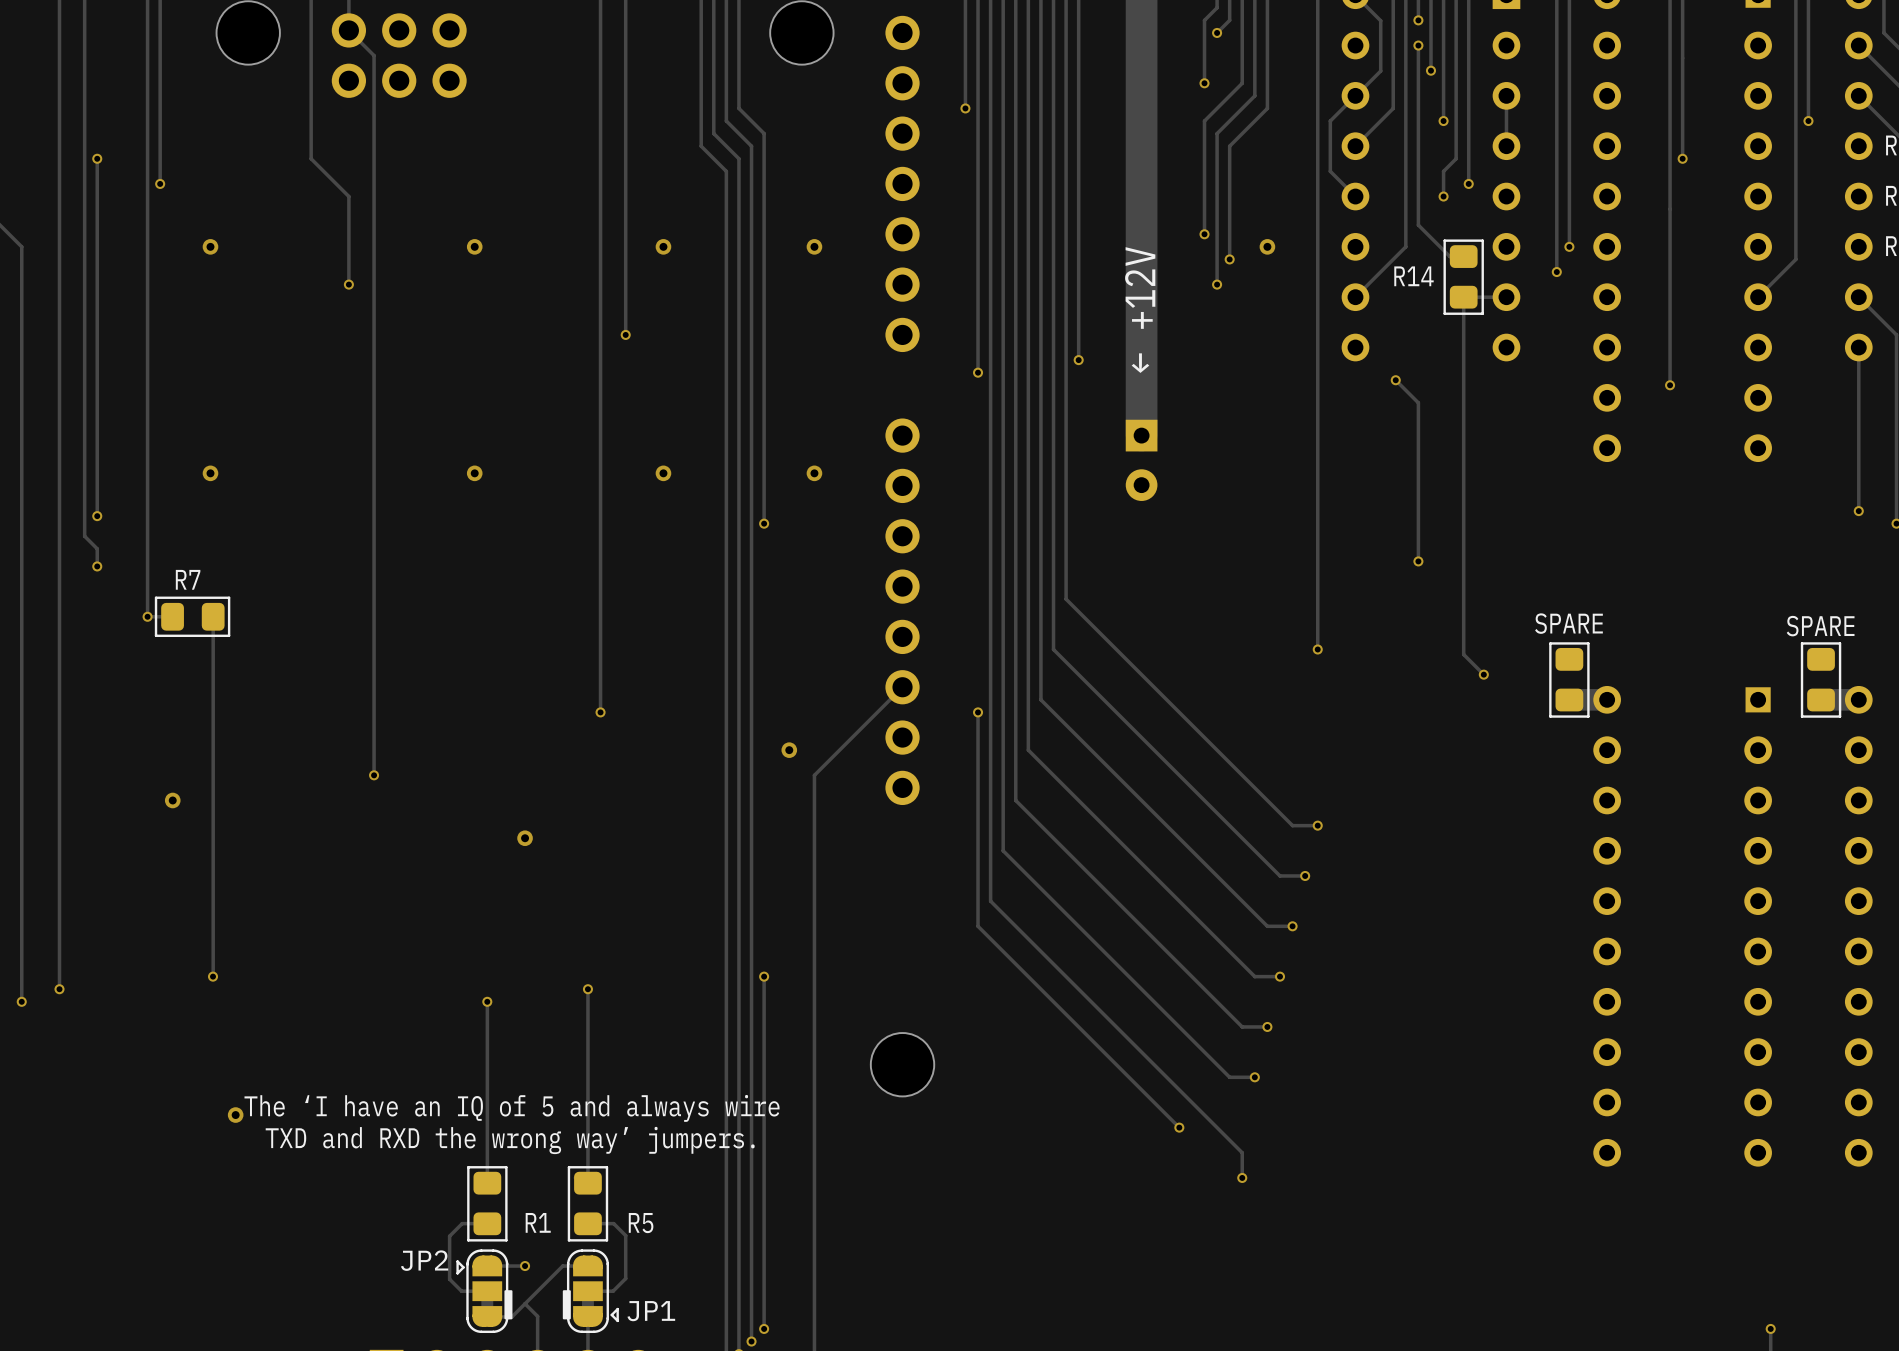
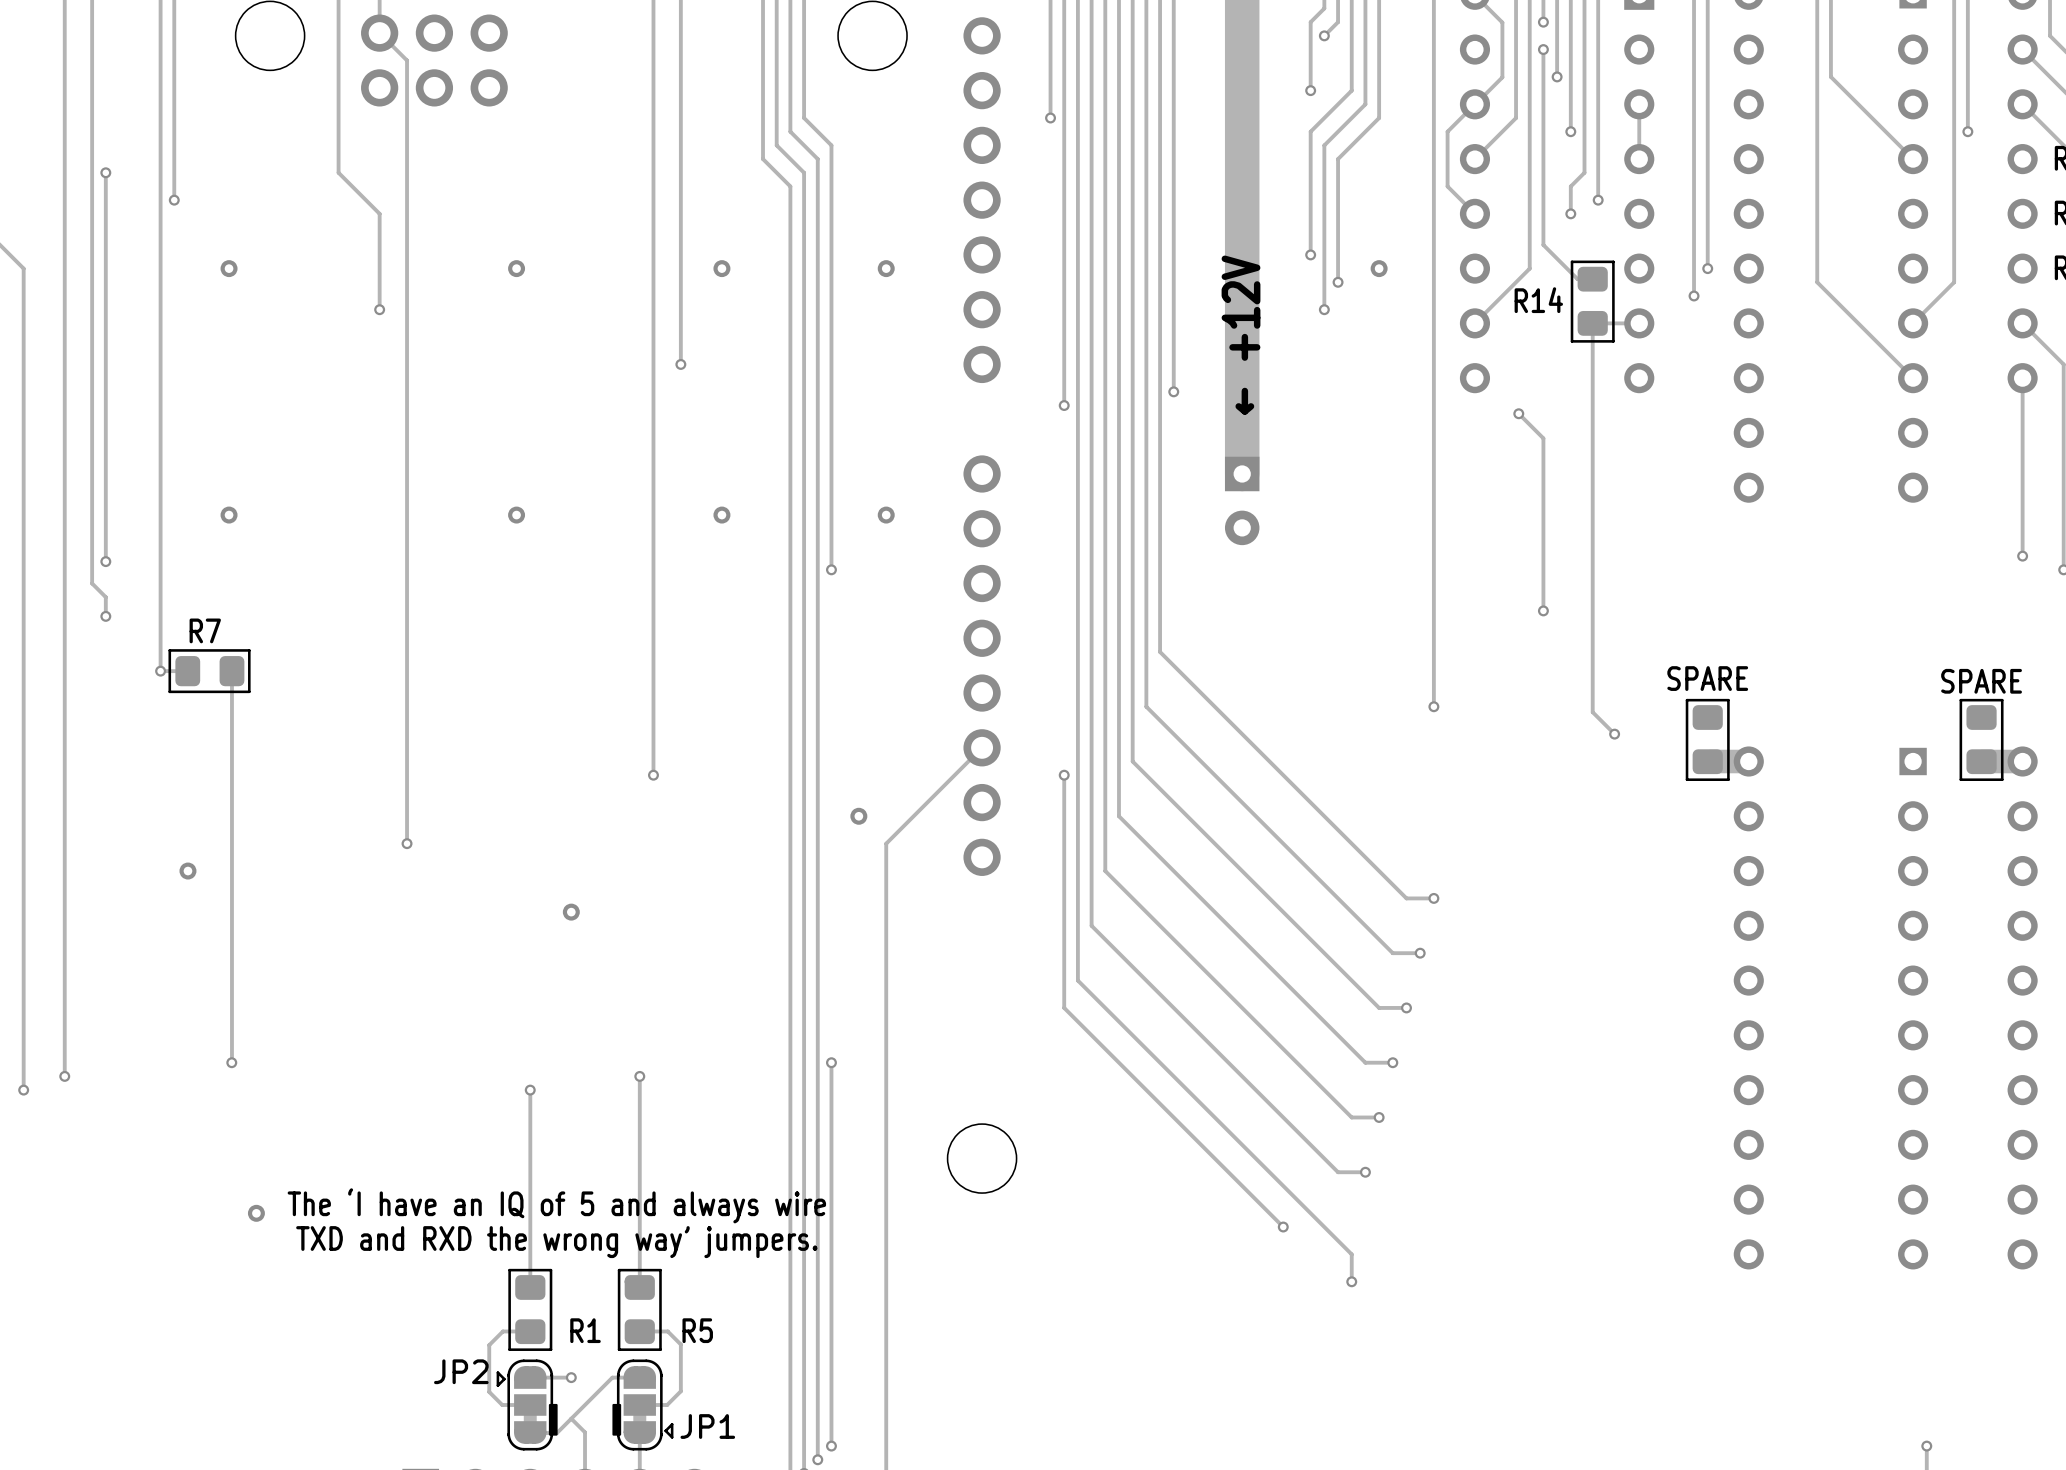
track: (1682, 70) (1682, 158) -> (1830, 76) (1913, 159)
via: (1682, 158) -> none
track: (1670, 259) (1670, 385) -> (1817, 282) (1913, 378)
via: (1670, 385) -> none

